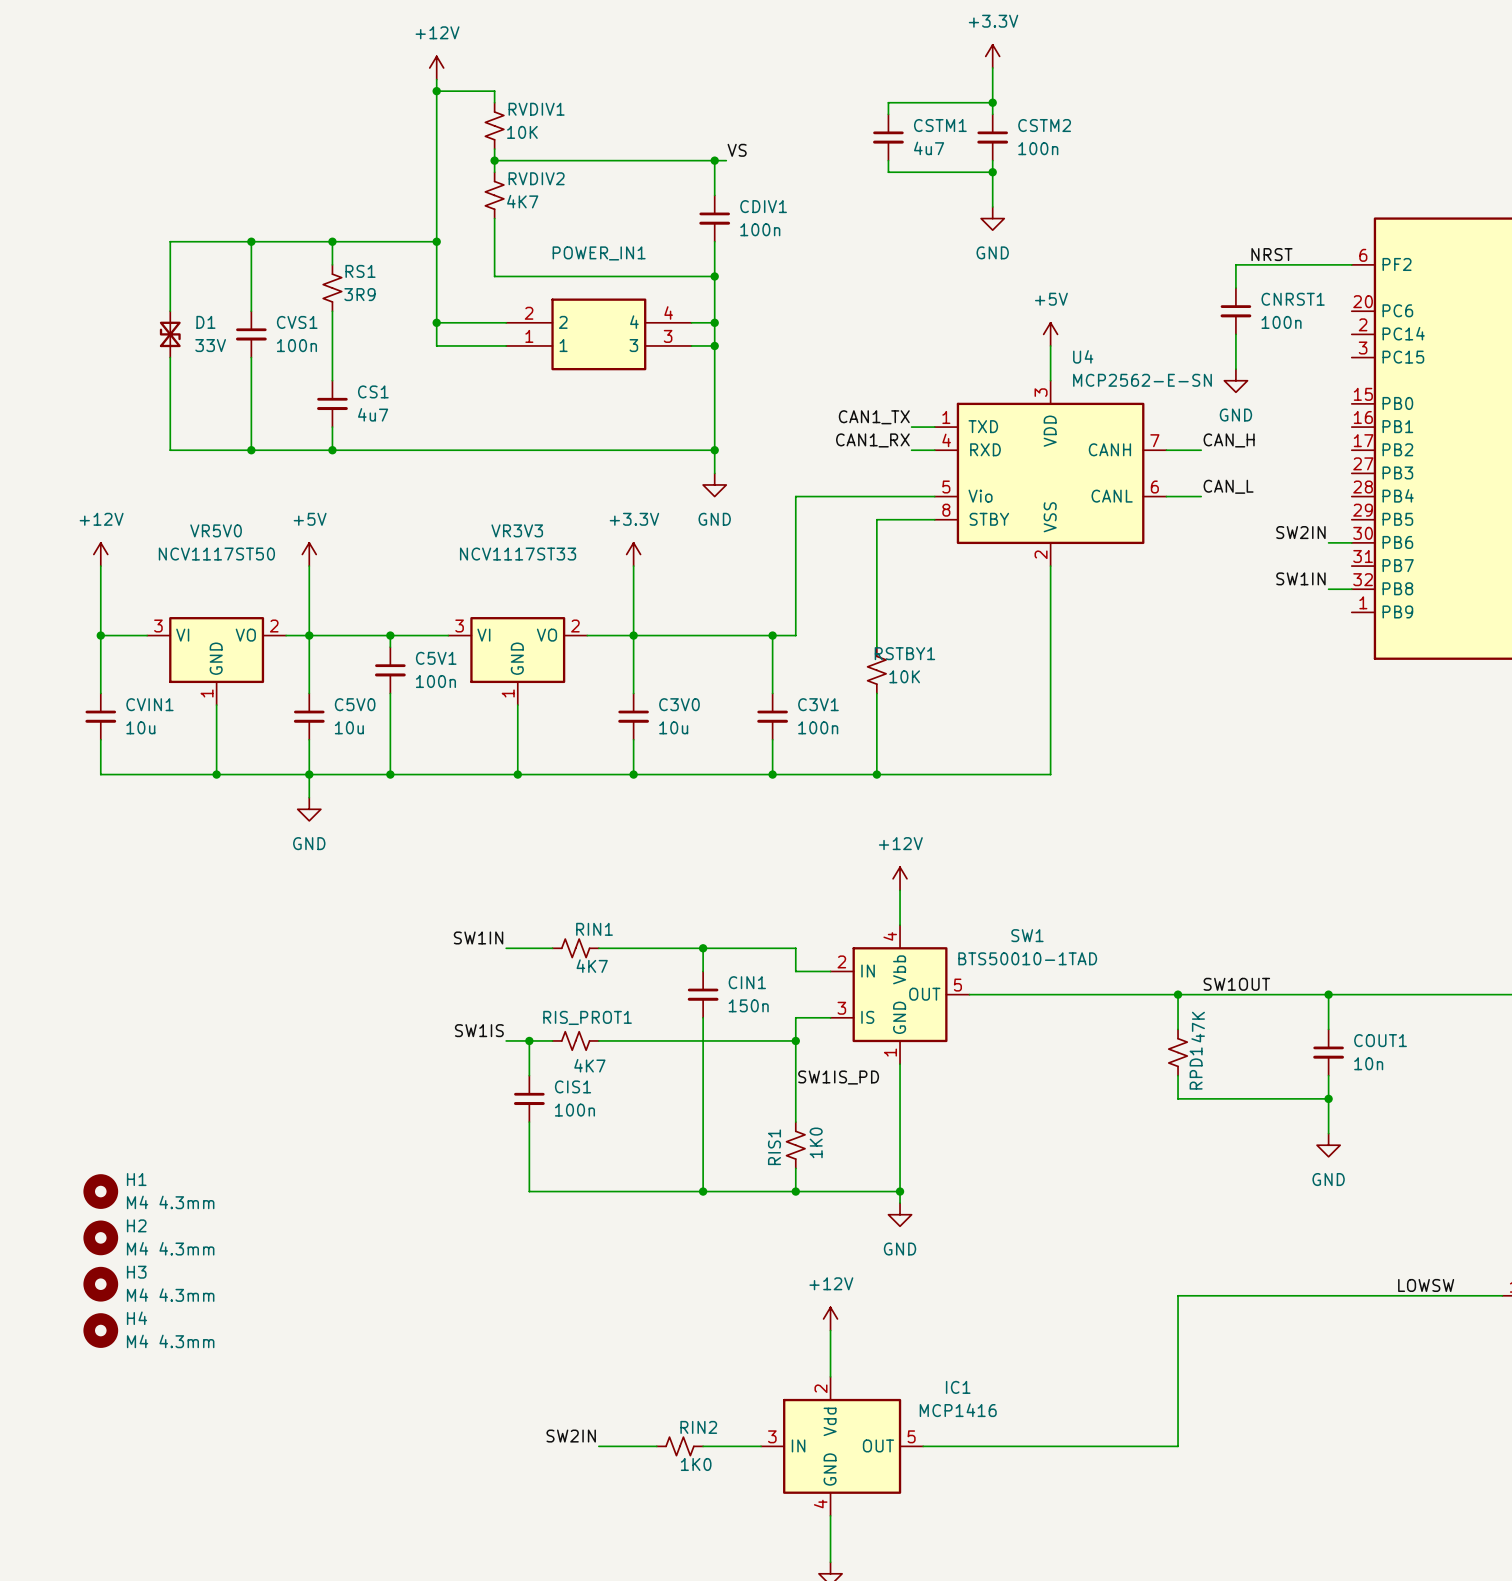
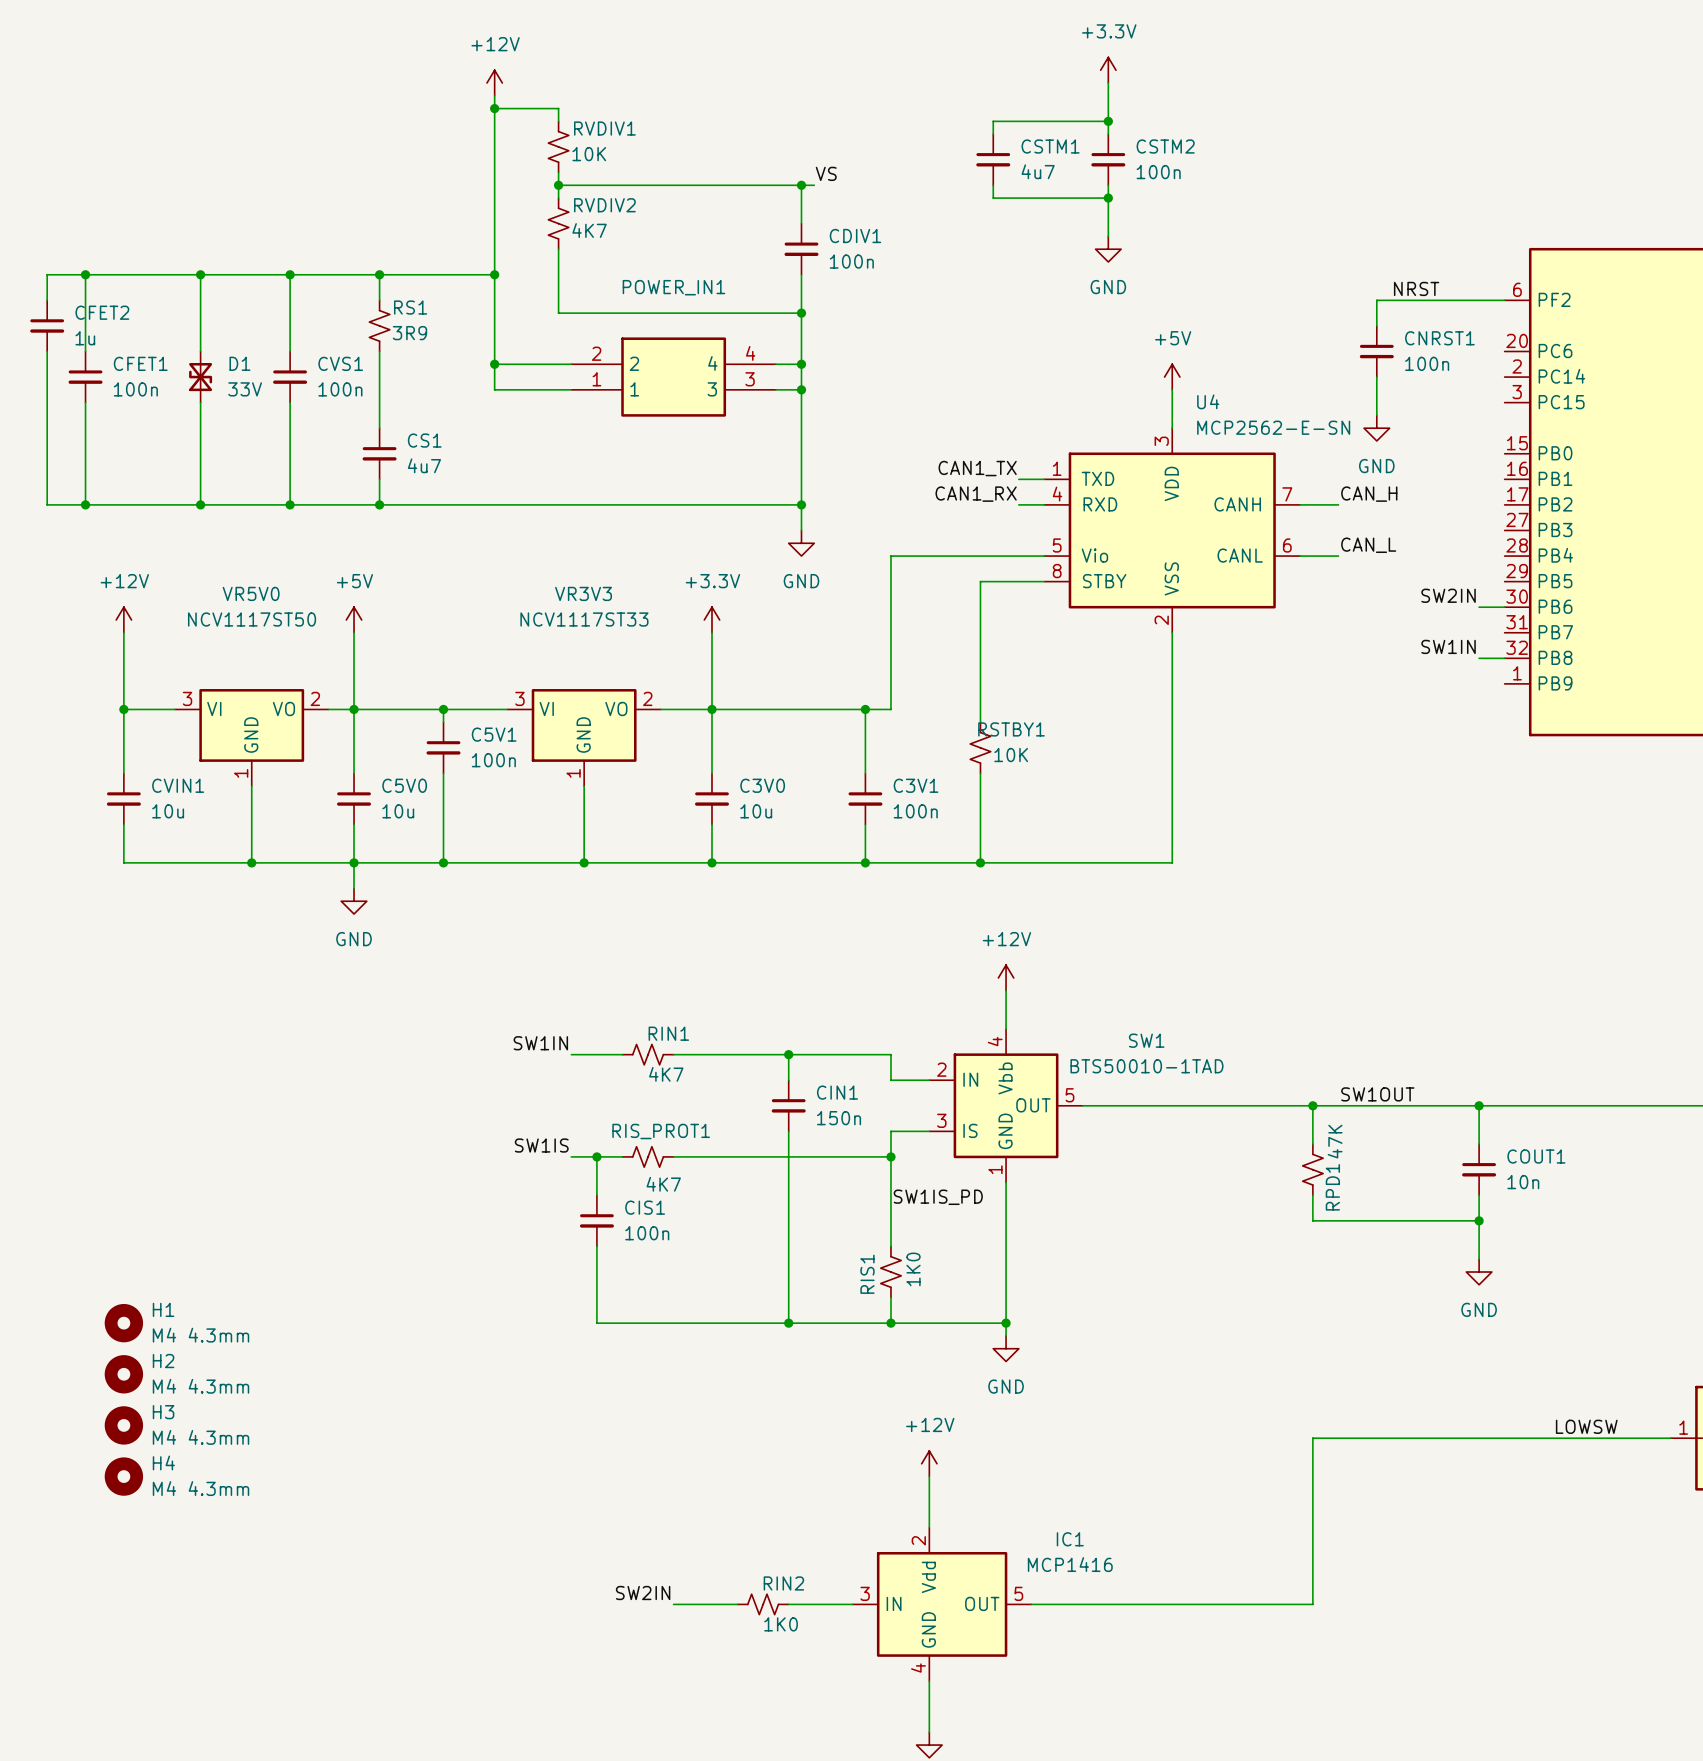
wire: none -> (85, 274) (85, 351)
junction: none -> (85, 274)
wire: none -> (200, 274) (47, 274) (47, 300)
junction: none -> (200, 274)
CFET2: none -> 1u (47, 325)
wire: none -> (47, 351) (47, 504) (200, 504)
CFET1: none -> 100n (85, 377)
wire: none -> (85, 402) (85, 504)
junction: none -> (85, 504)
junction: none -> (200, 504)

